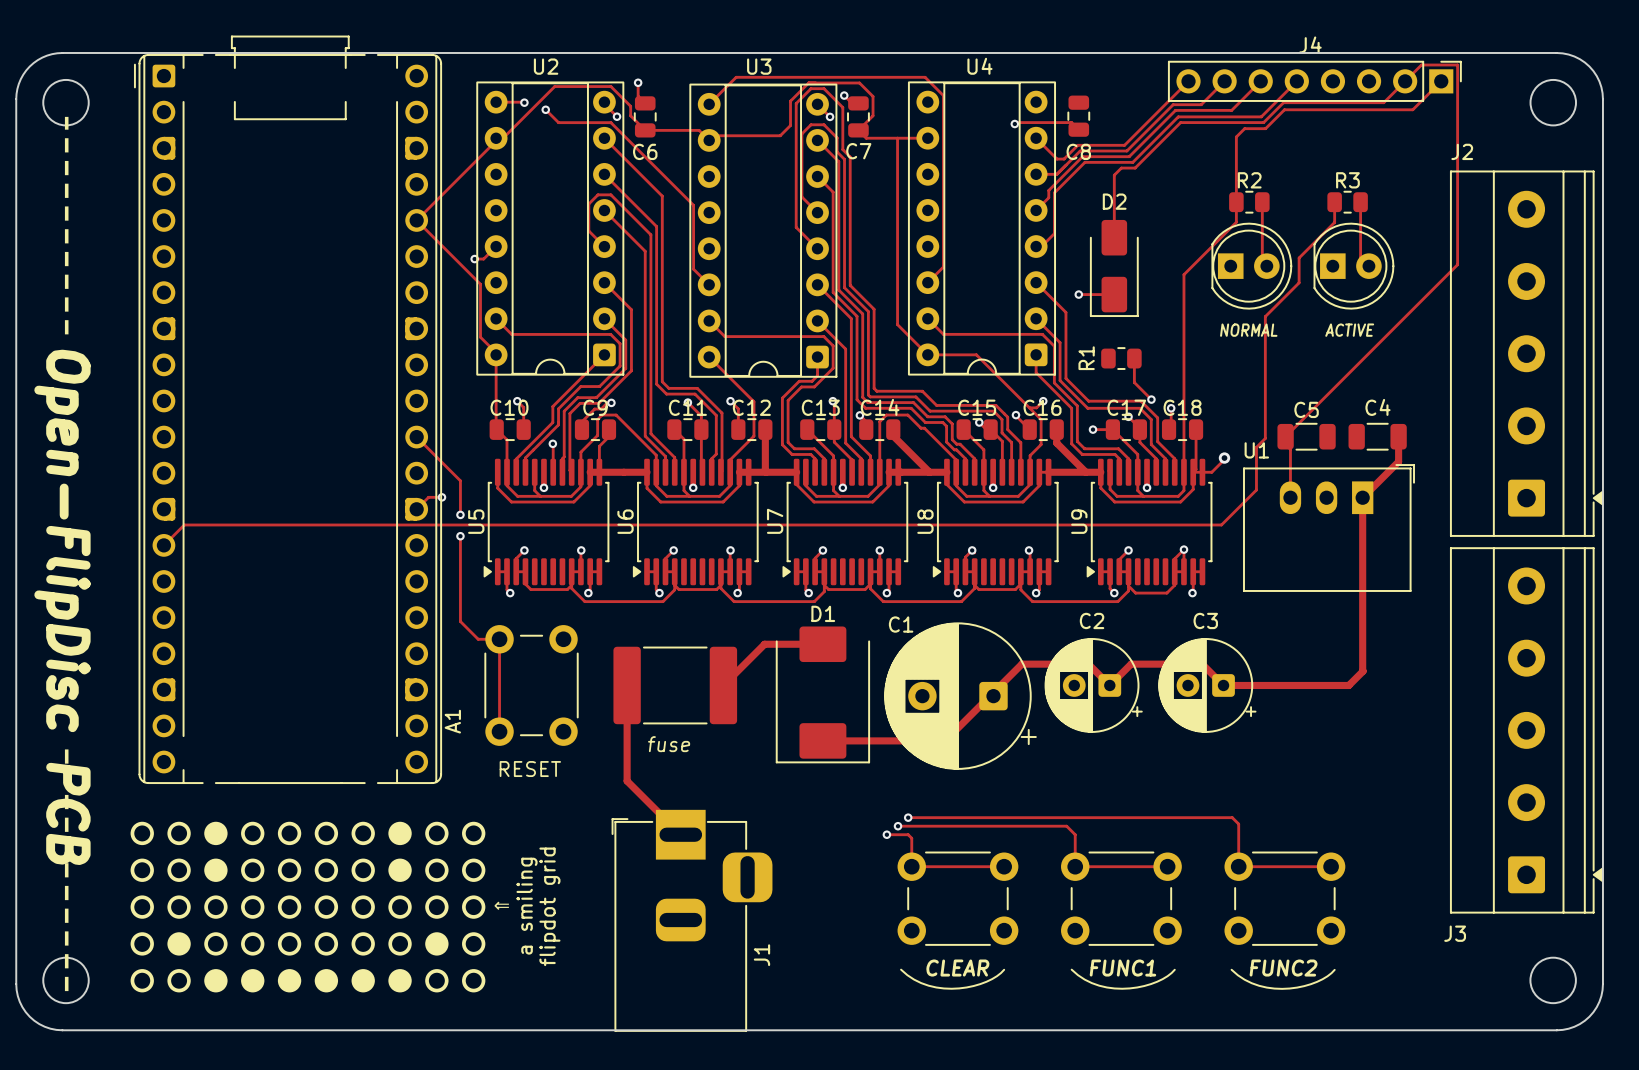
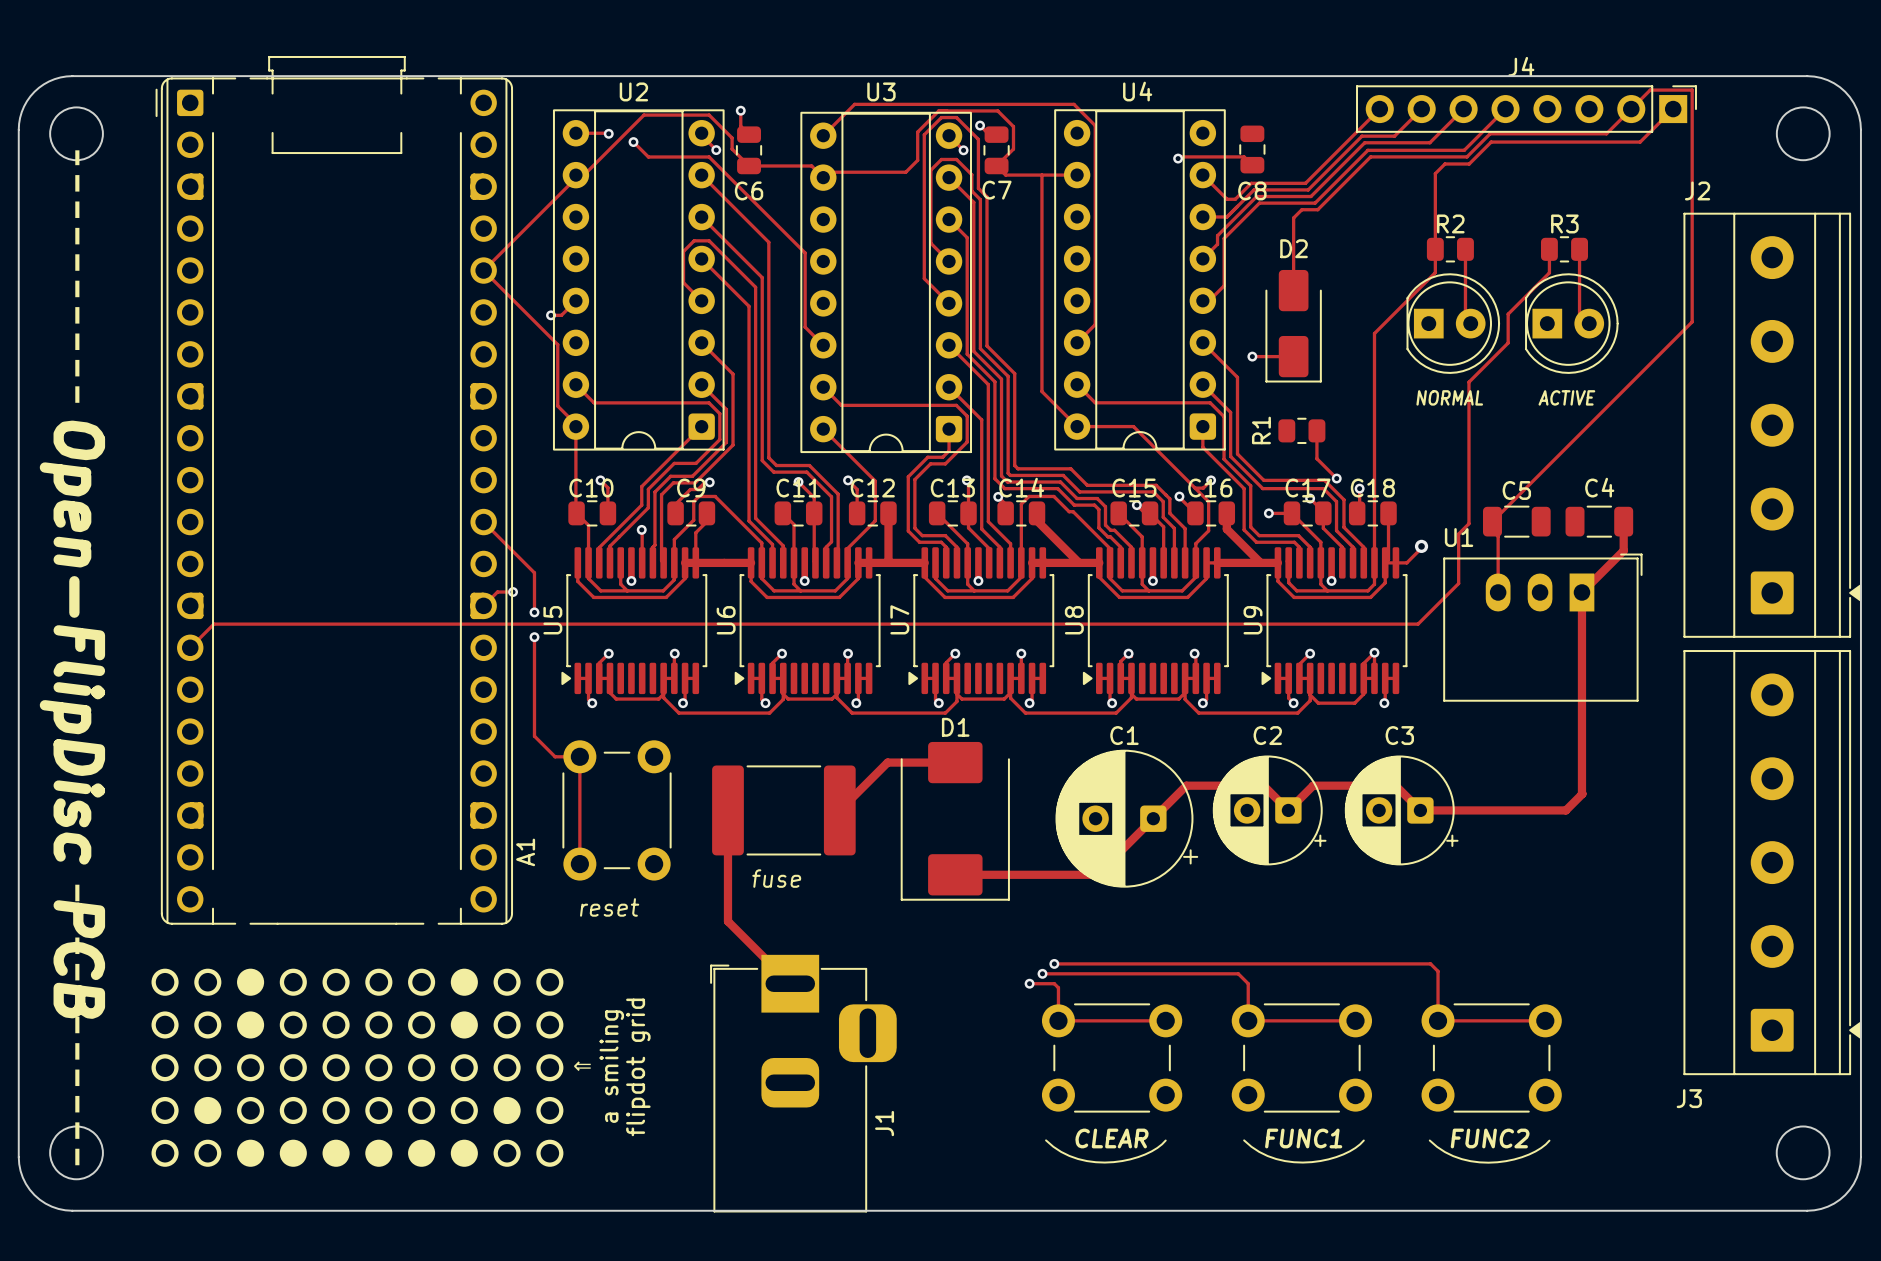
C1 footprint: [884, 622, 1037, 770] -> [1055, 749, 1199, 888]
C1 name position: C1 (901, 624) -> C1 (1124, 735)
text: RESET (530, 769) -> reset (609, 907)

